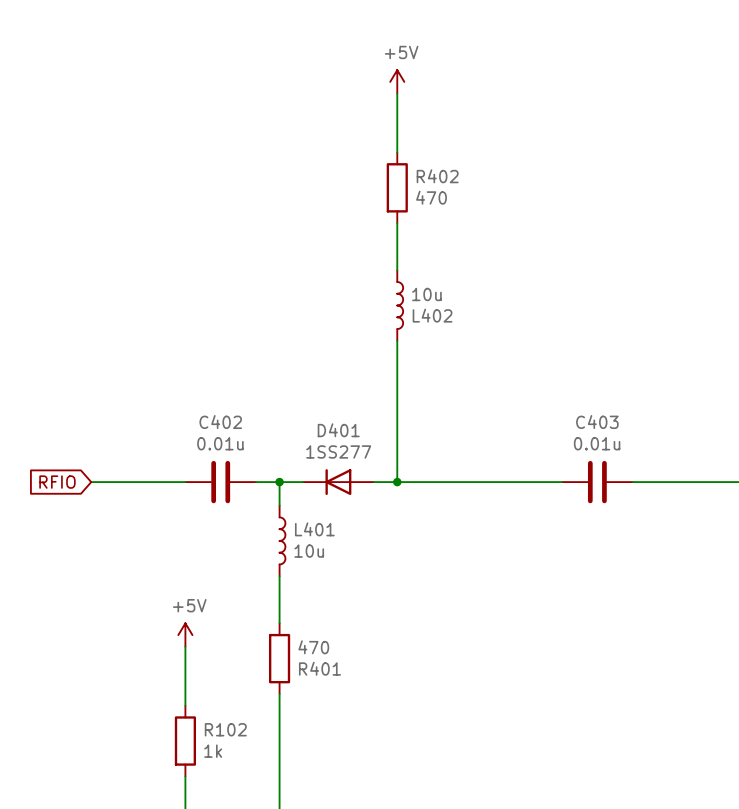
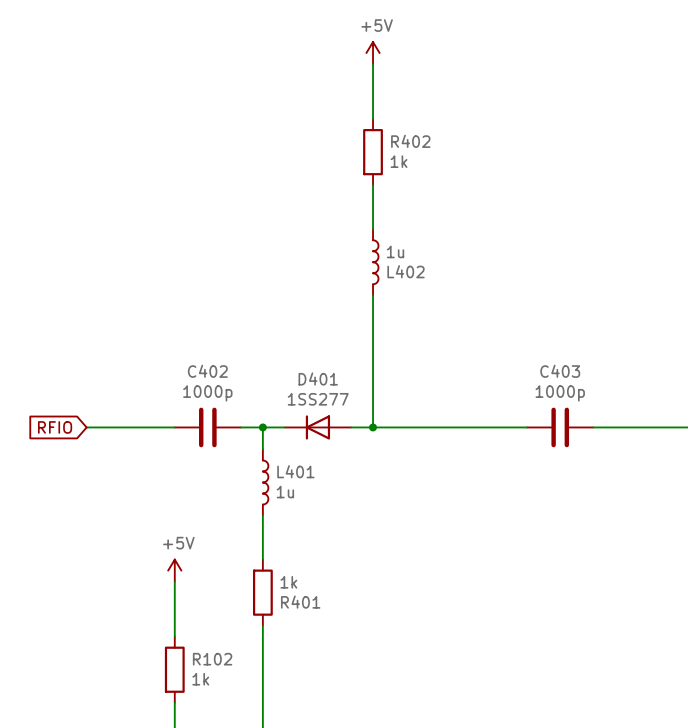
R402 value: 470 (431, 197) -> 1k (399, 161)
L402 value: 10u (426, 294) -> 1u (395, 251)
C402 value: 0.01u (220, 443) -> 1000p (207, 393)
C403 value: 0.01u (597, 443) -> 1000p (560, 393)
L401 value: 10u (309, 551) -> 1u (285, 492)
R401 value: 470 (313, 647) -> 1k (288, 582)

